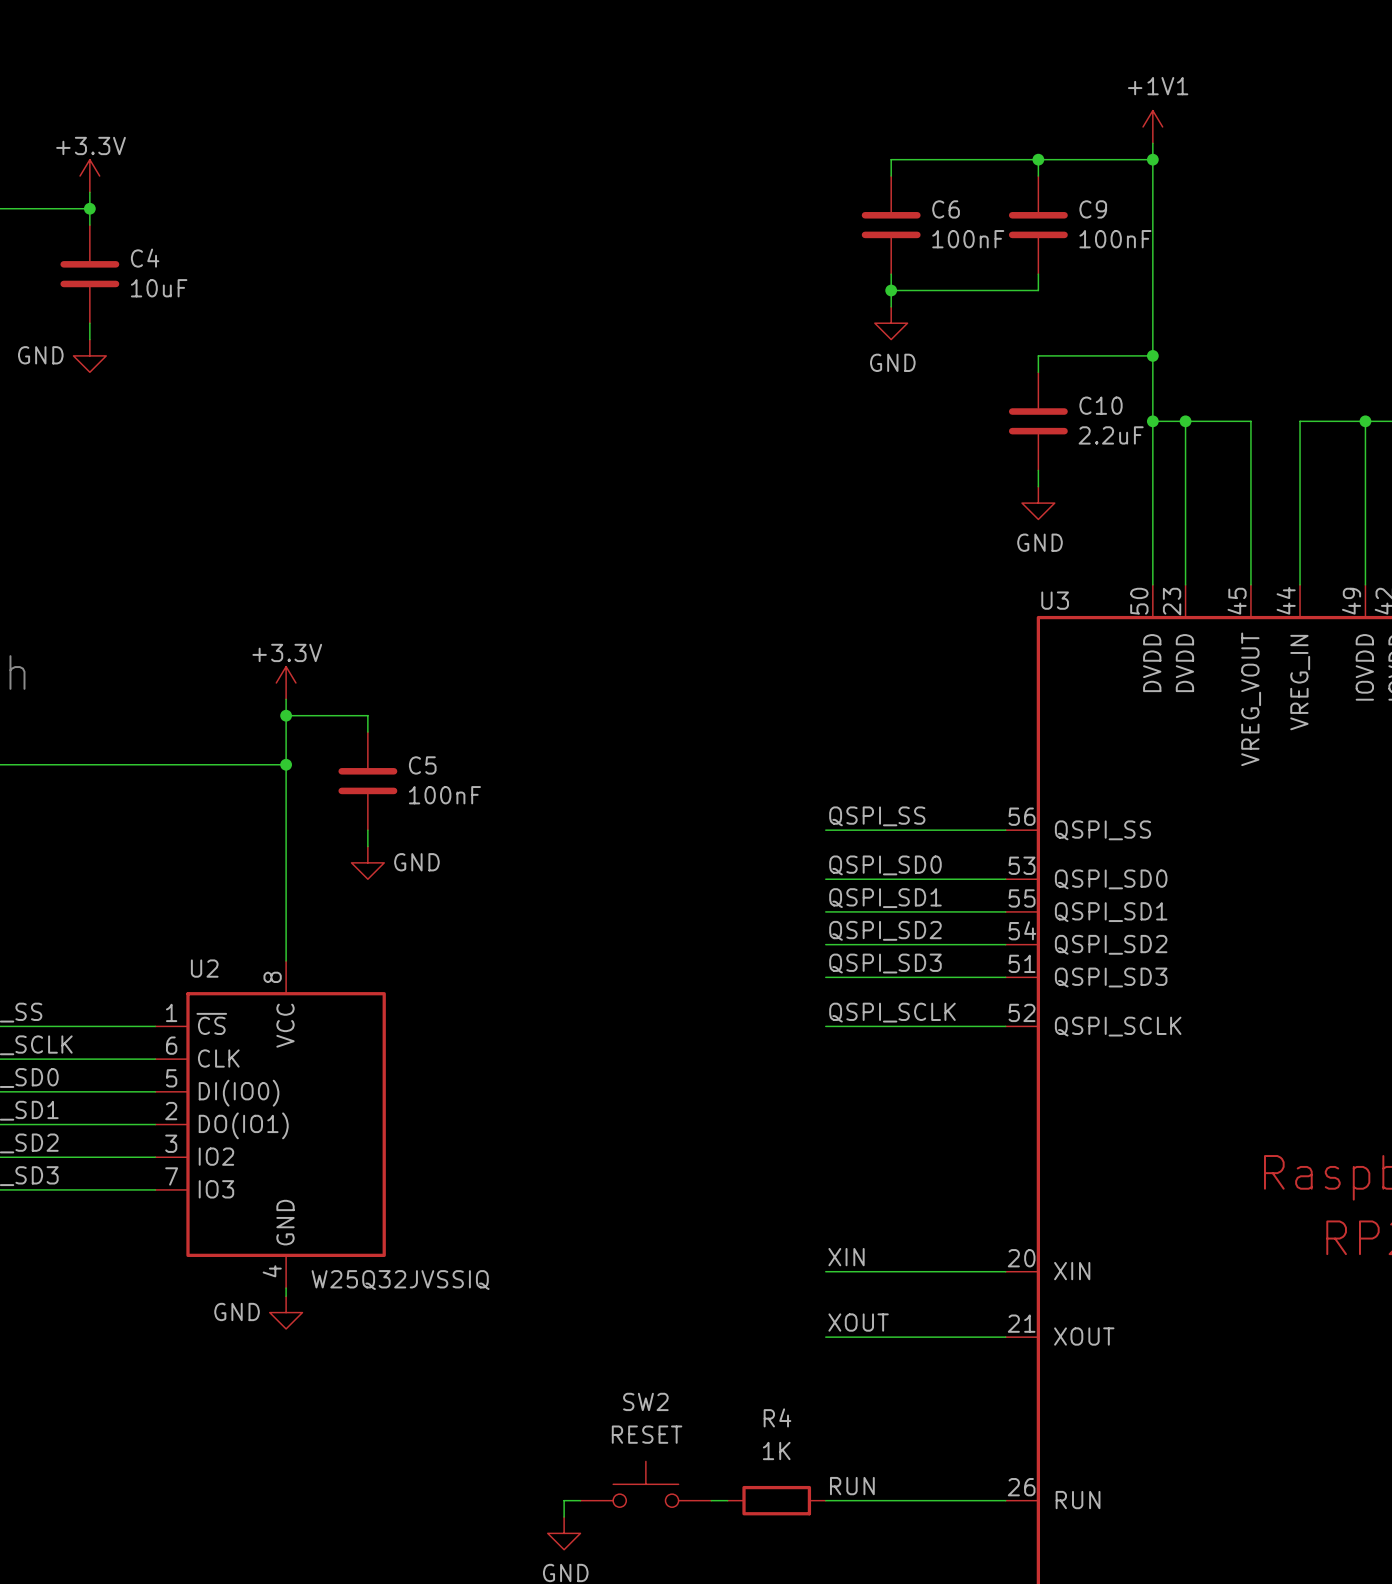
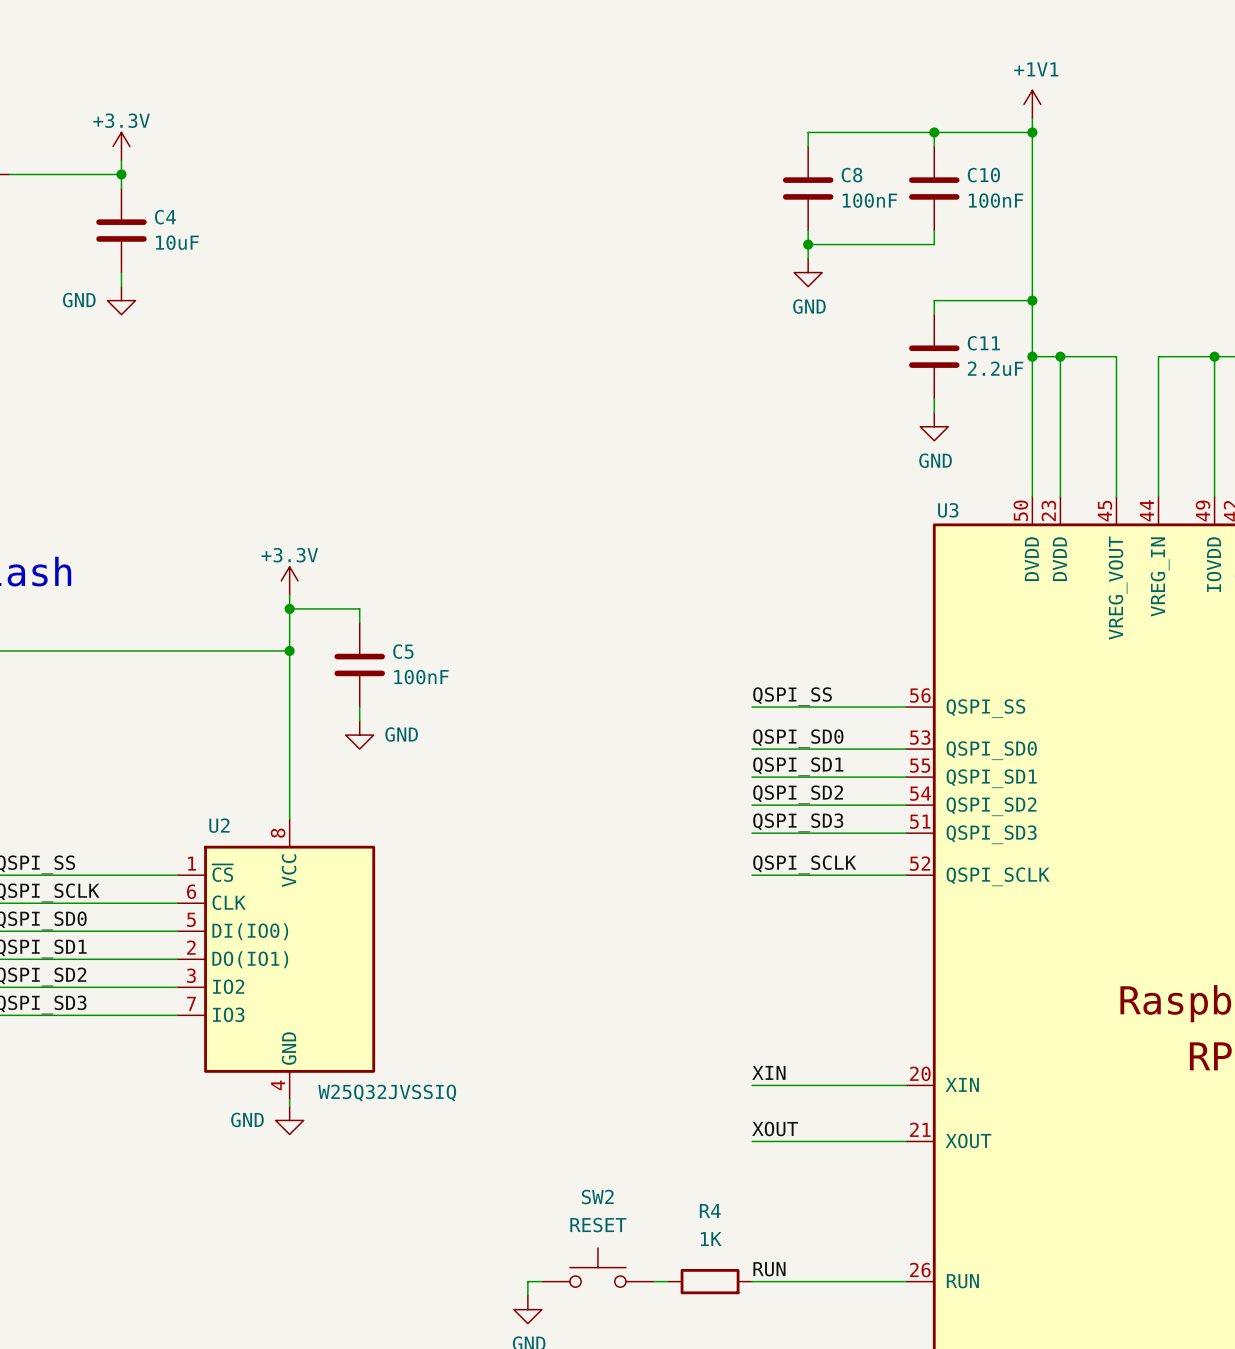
C6 name: C6 (946, 209) -> C8 (852, 175)
C9 name: C9 (1093, 209) -> C10 (983, 175)
C10 name: C10 (1101, 405) -> C11 (983, 343)

